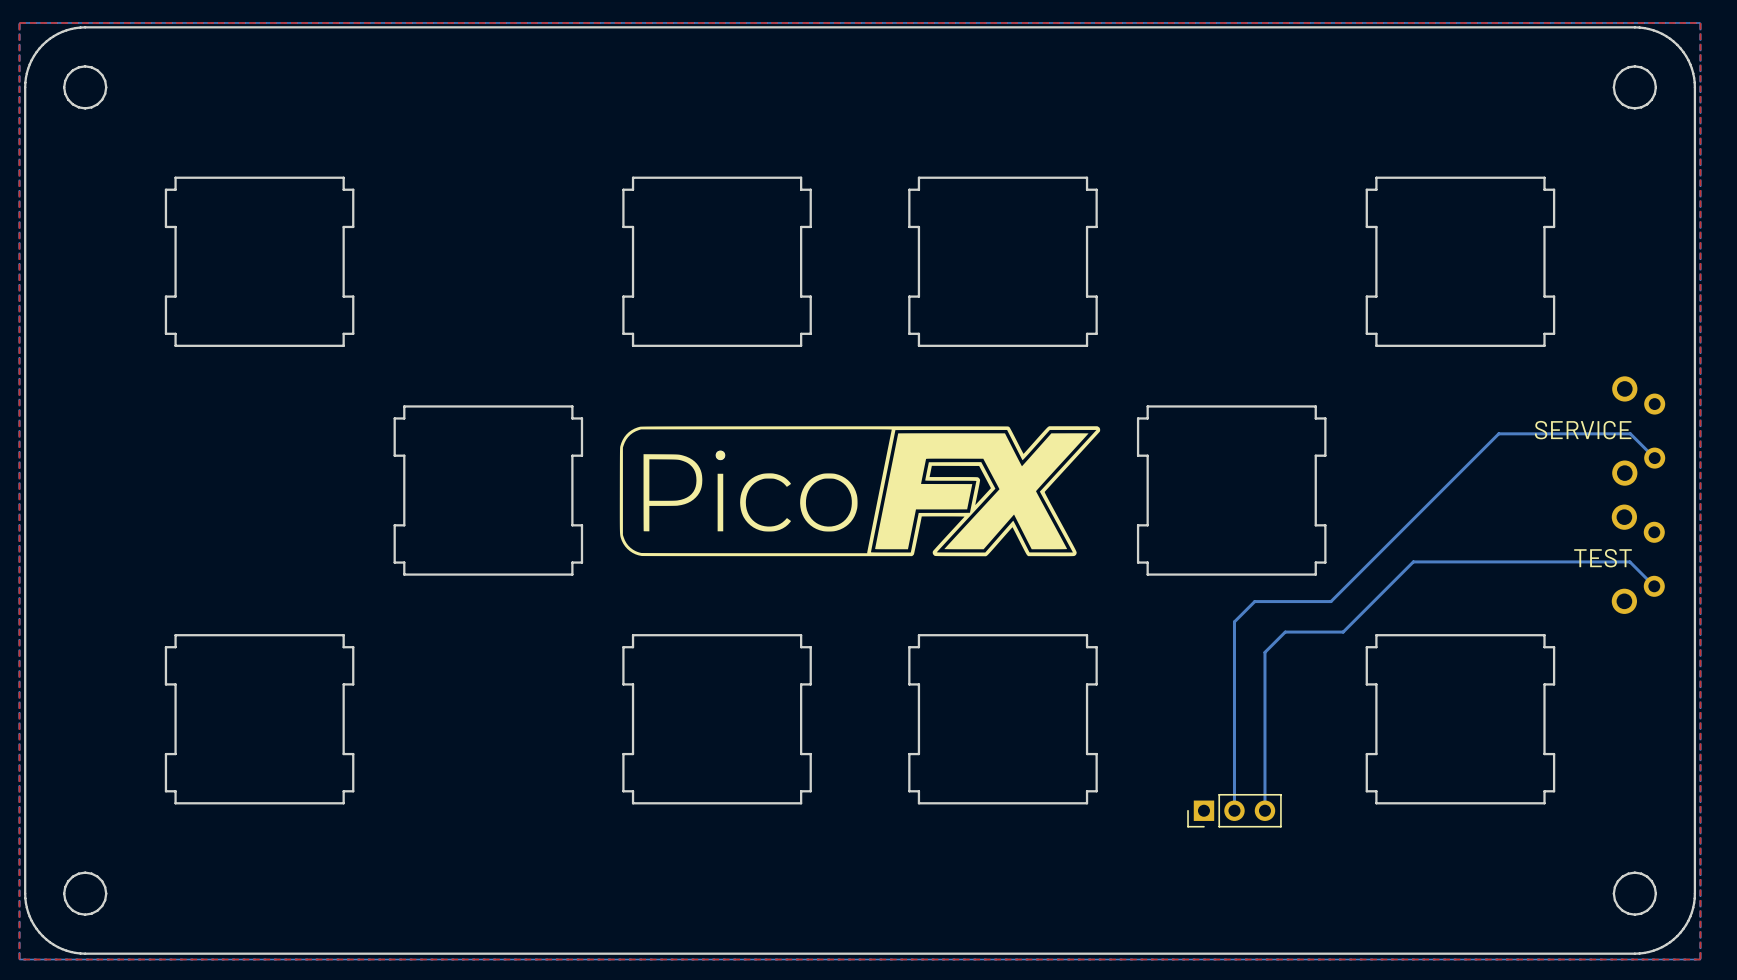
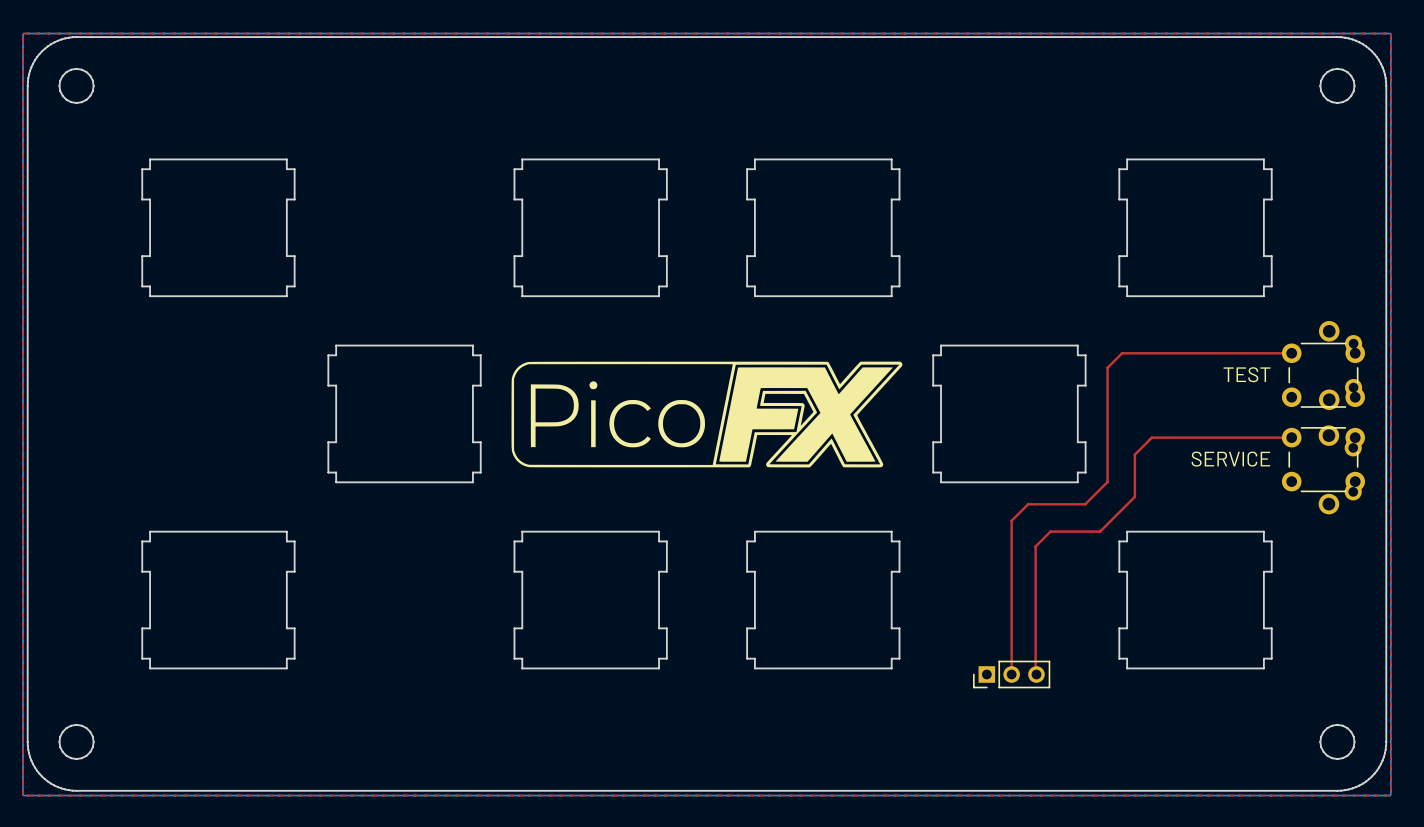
top track: none -> (1291, 353) (1122, 353) (1107, 367) (1107, 481) (1085, 504) (1028, 504) (1011, 520) (1011, 674)
text position: SERVICE (1583, 430) -> SERVICE (1230, 459)
part: none -> (1323, 375)
bottom track: (1654, 458) (1630, 433) (1498, 433) (1331, 601) (1254, 601) (1234, 621) (1234, 810) -> none
top track: none -> (1291, 437) (1151, 437) (1134, 454) (1134, 496) (1100, 531) (1050, 531) (1035, 546) (1036, 674)
part: none -> (1323, 459)
text position: TEST (1603, 558) -> TEST (1246, 374)
bottom track: (1654, 586) (1629, 561) (1413, 561) (1343, 632) (1285, 632) (1264, 652) (1264, 810) -> none

